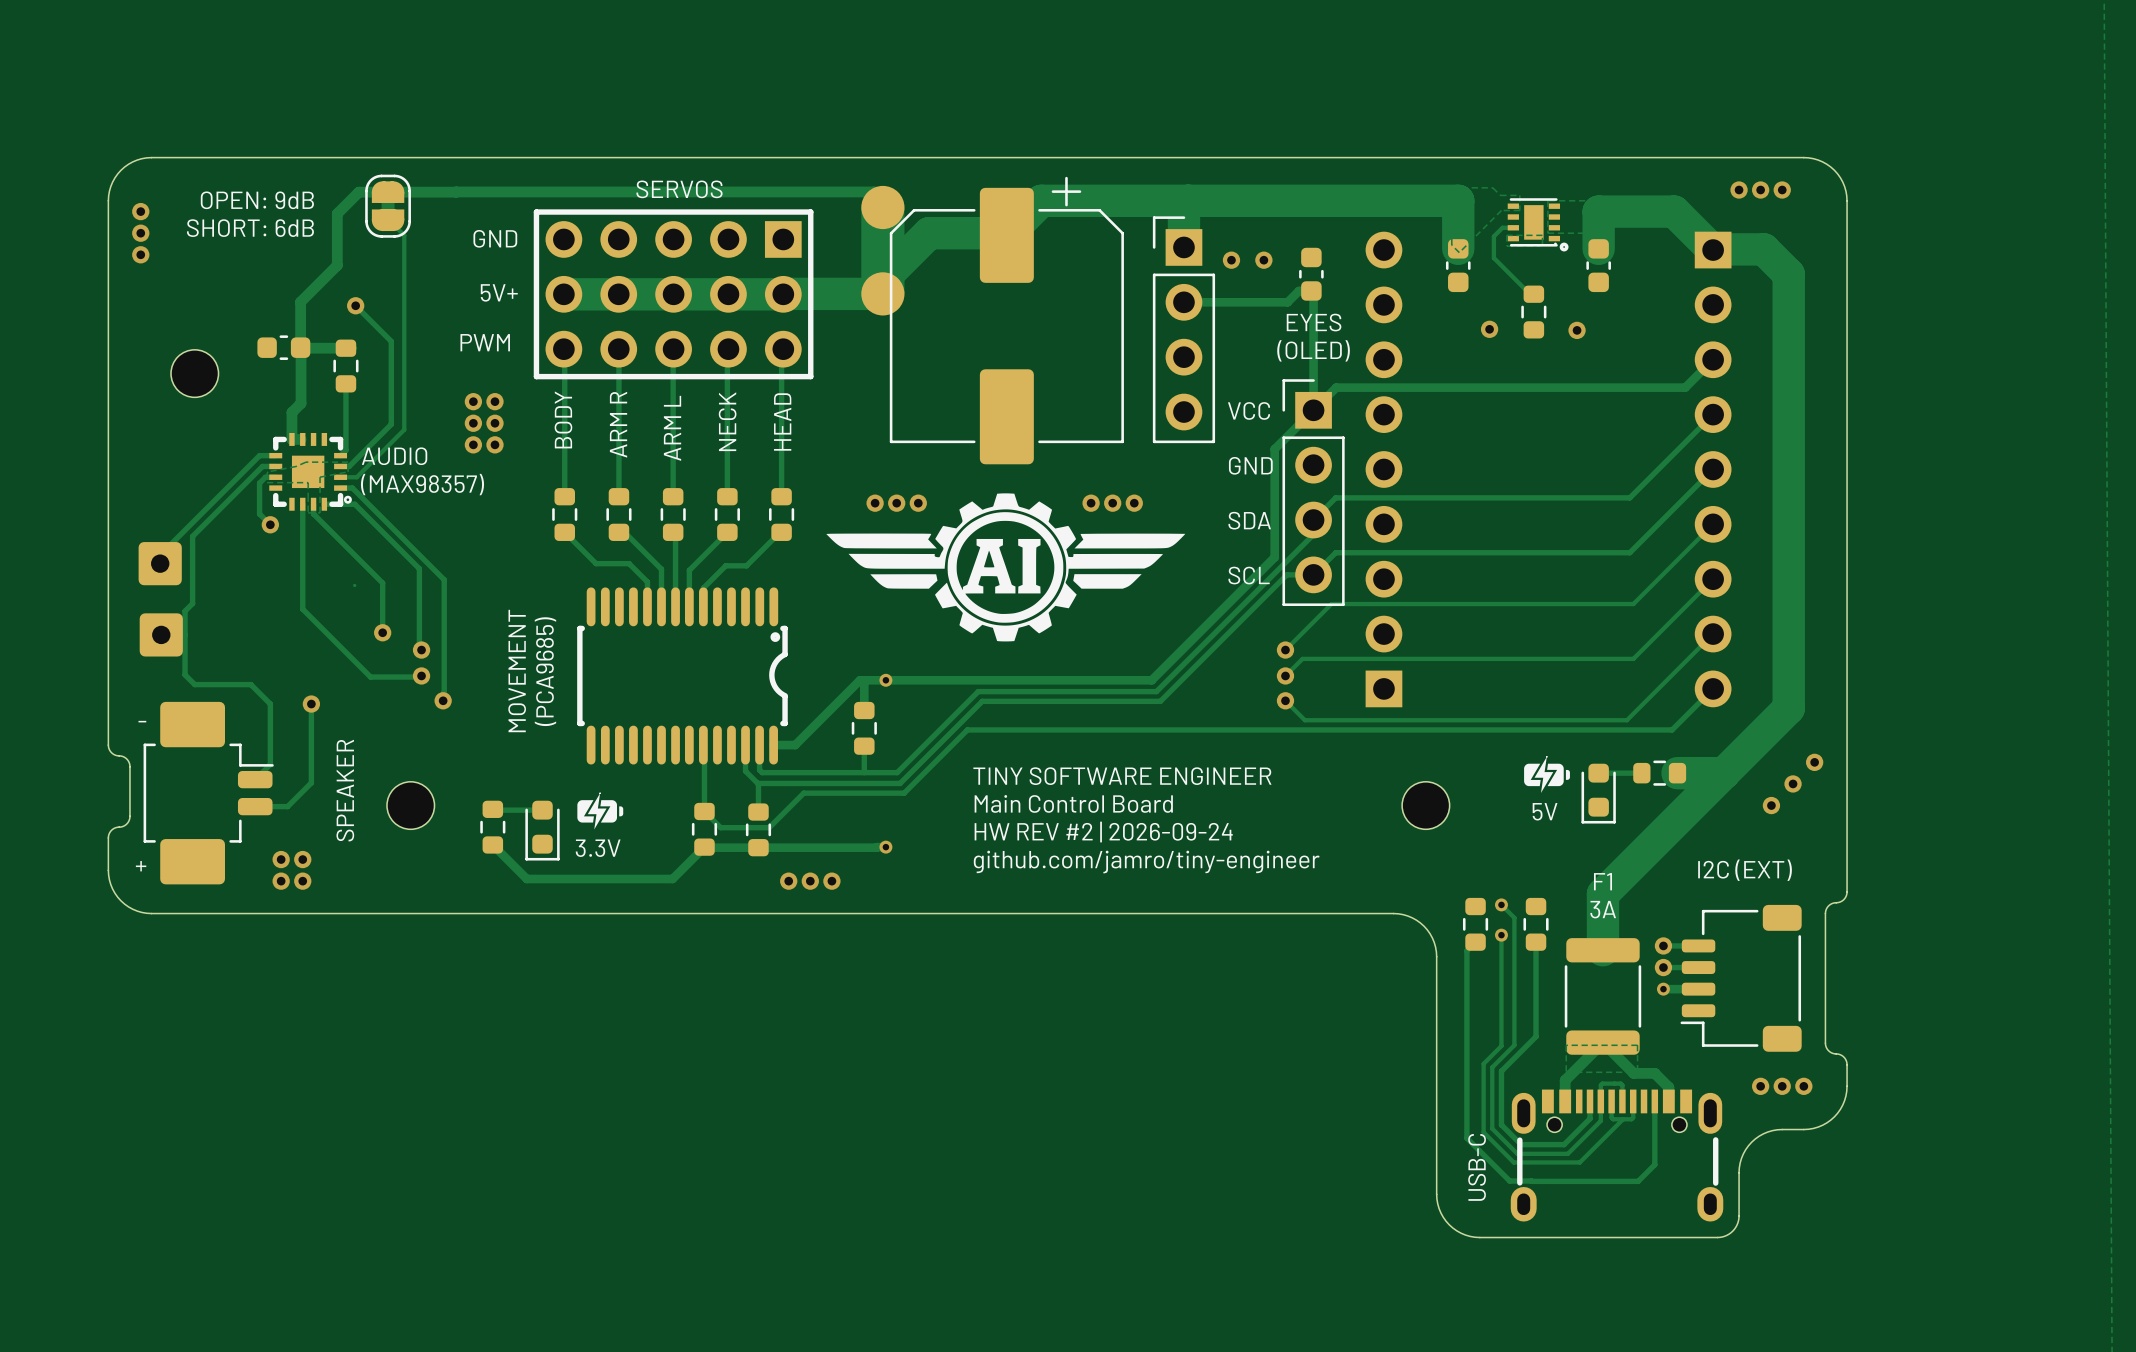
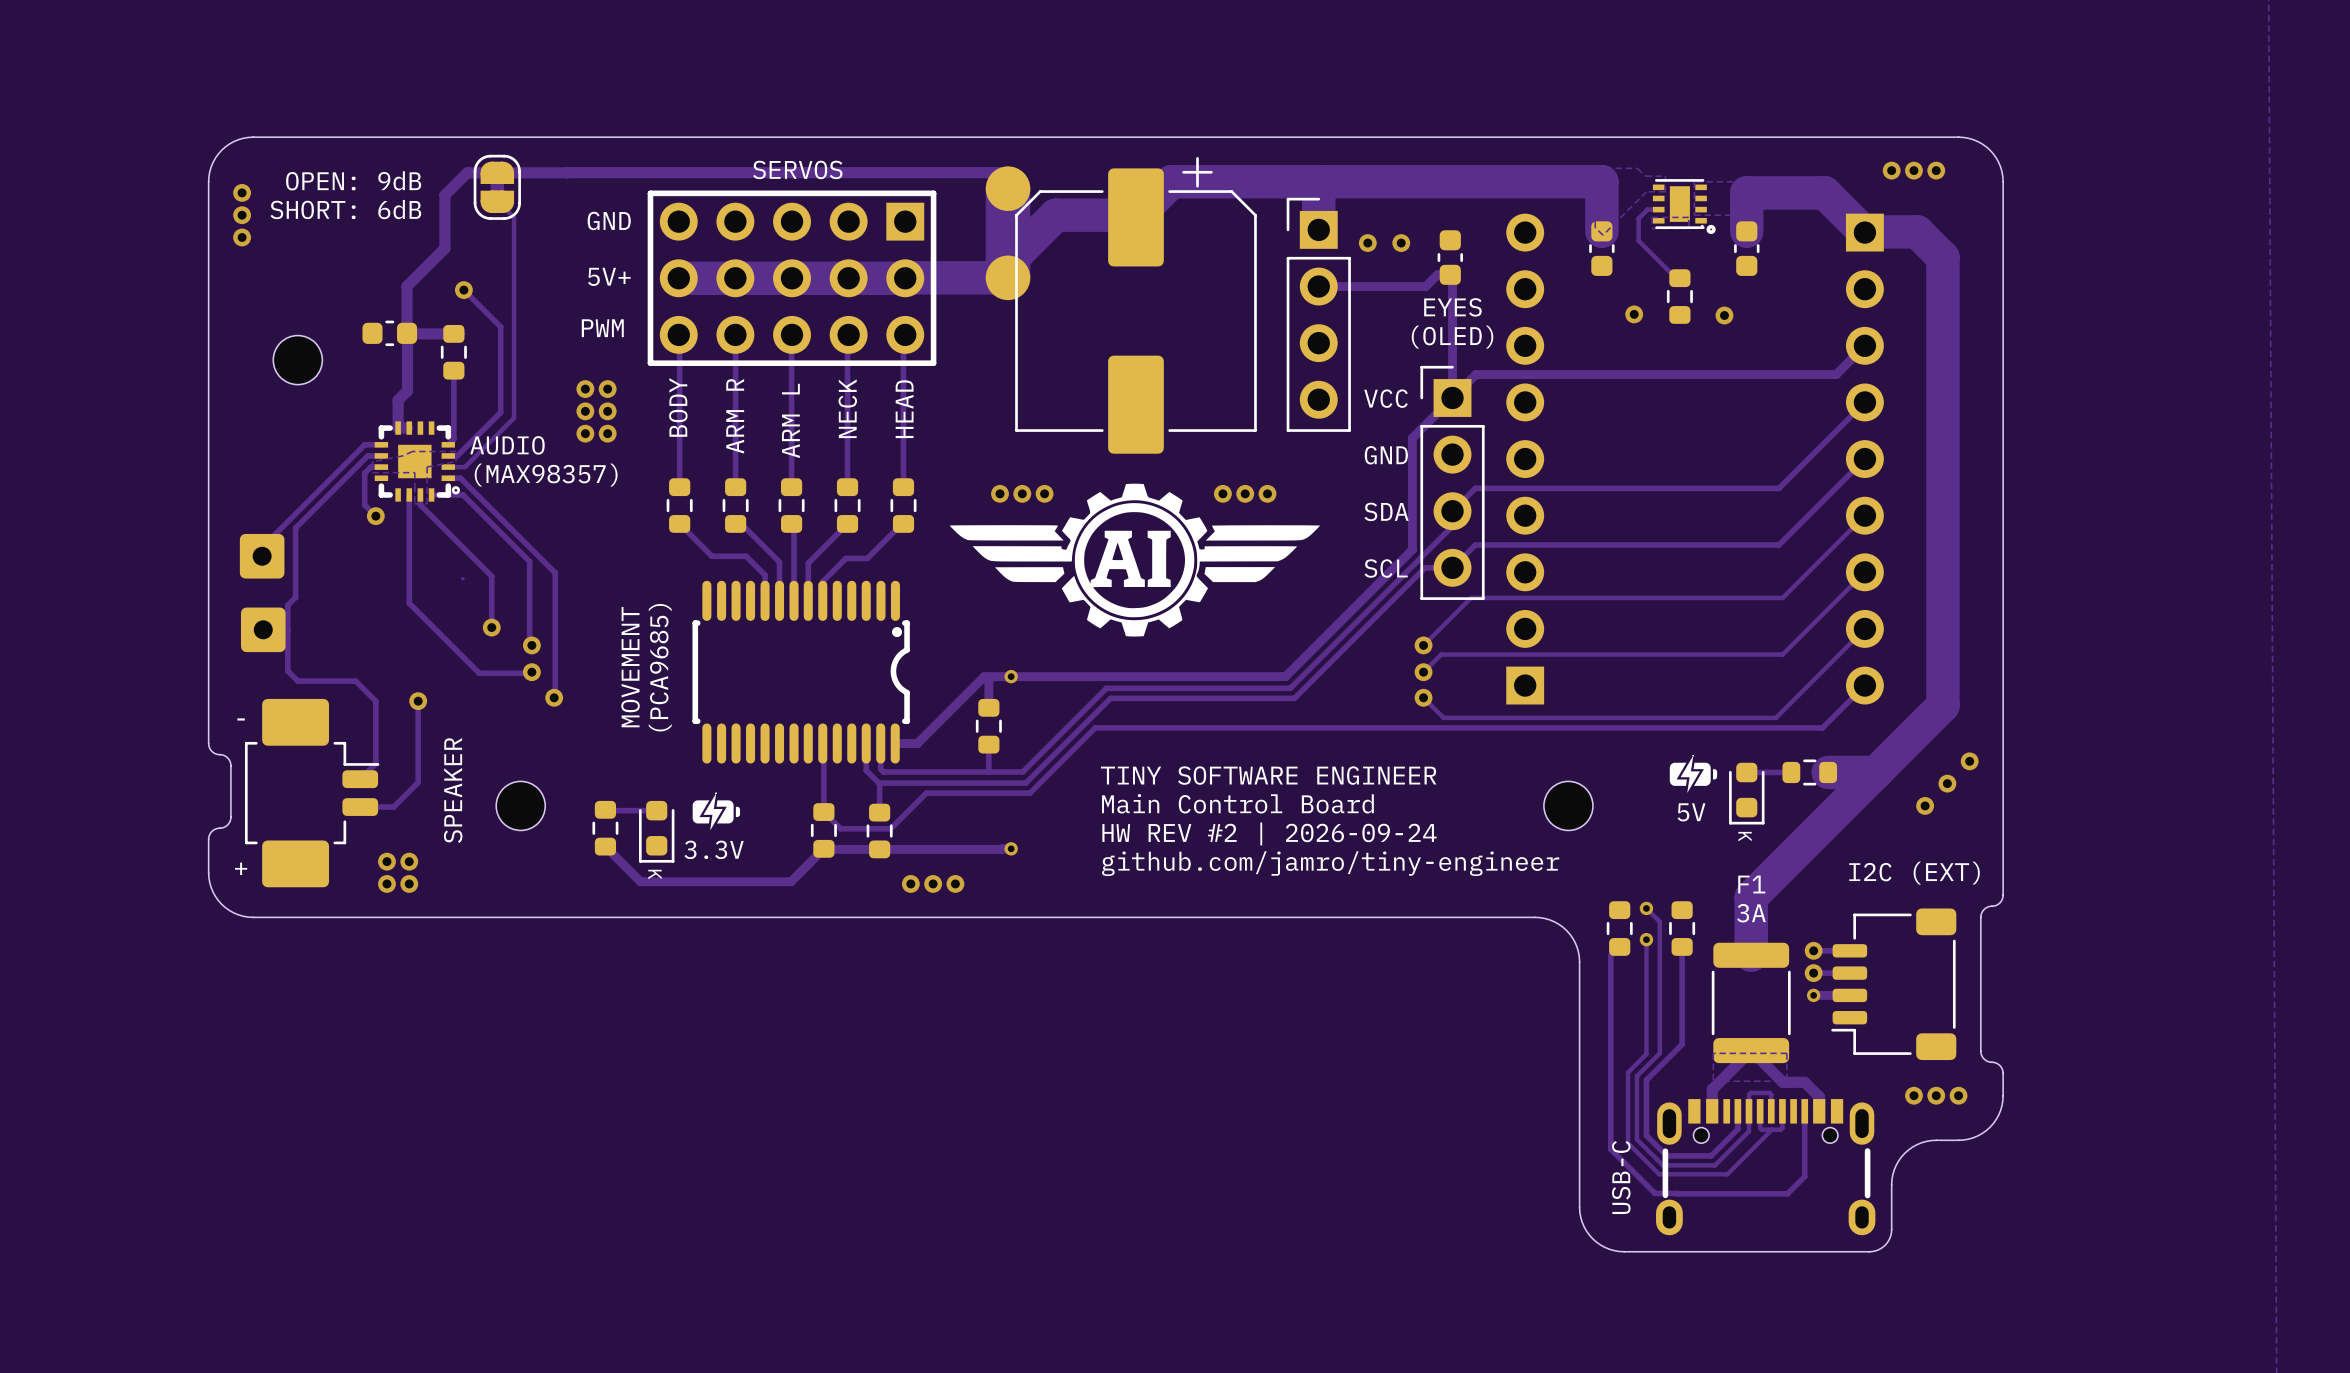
text: none -> K (1745, 836)
text: none -> K (654, 874)

